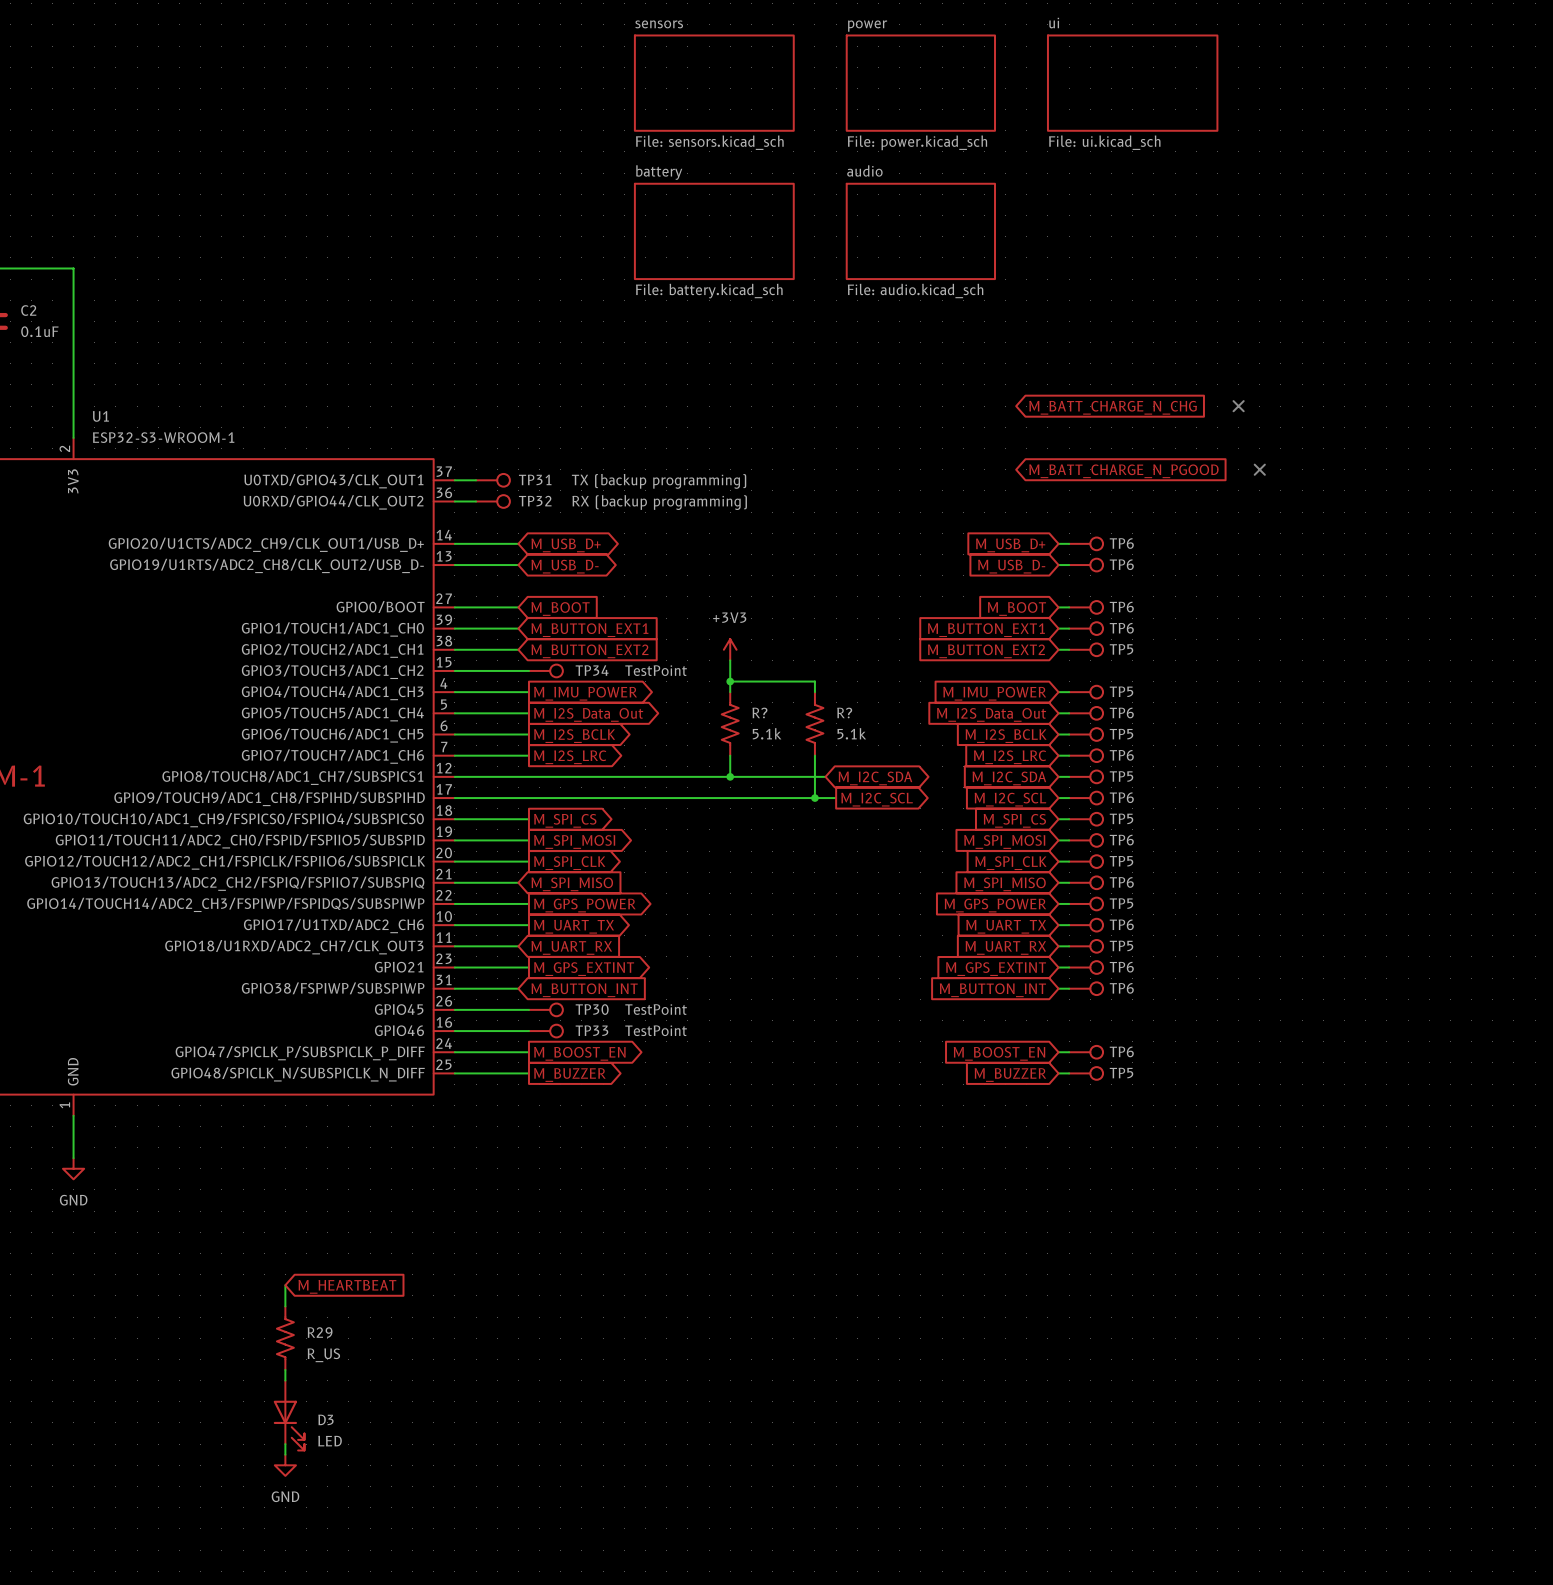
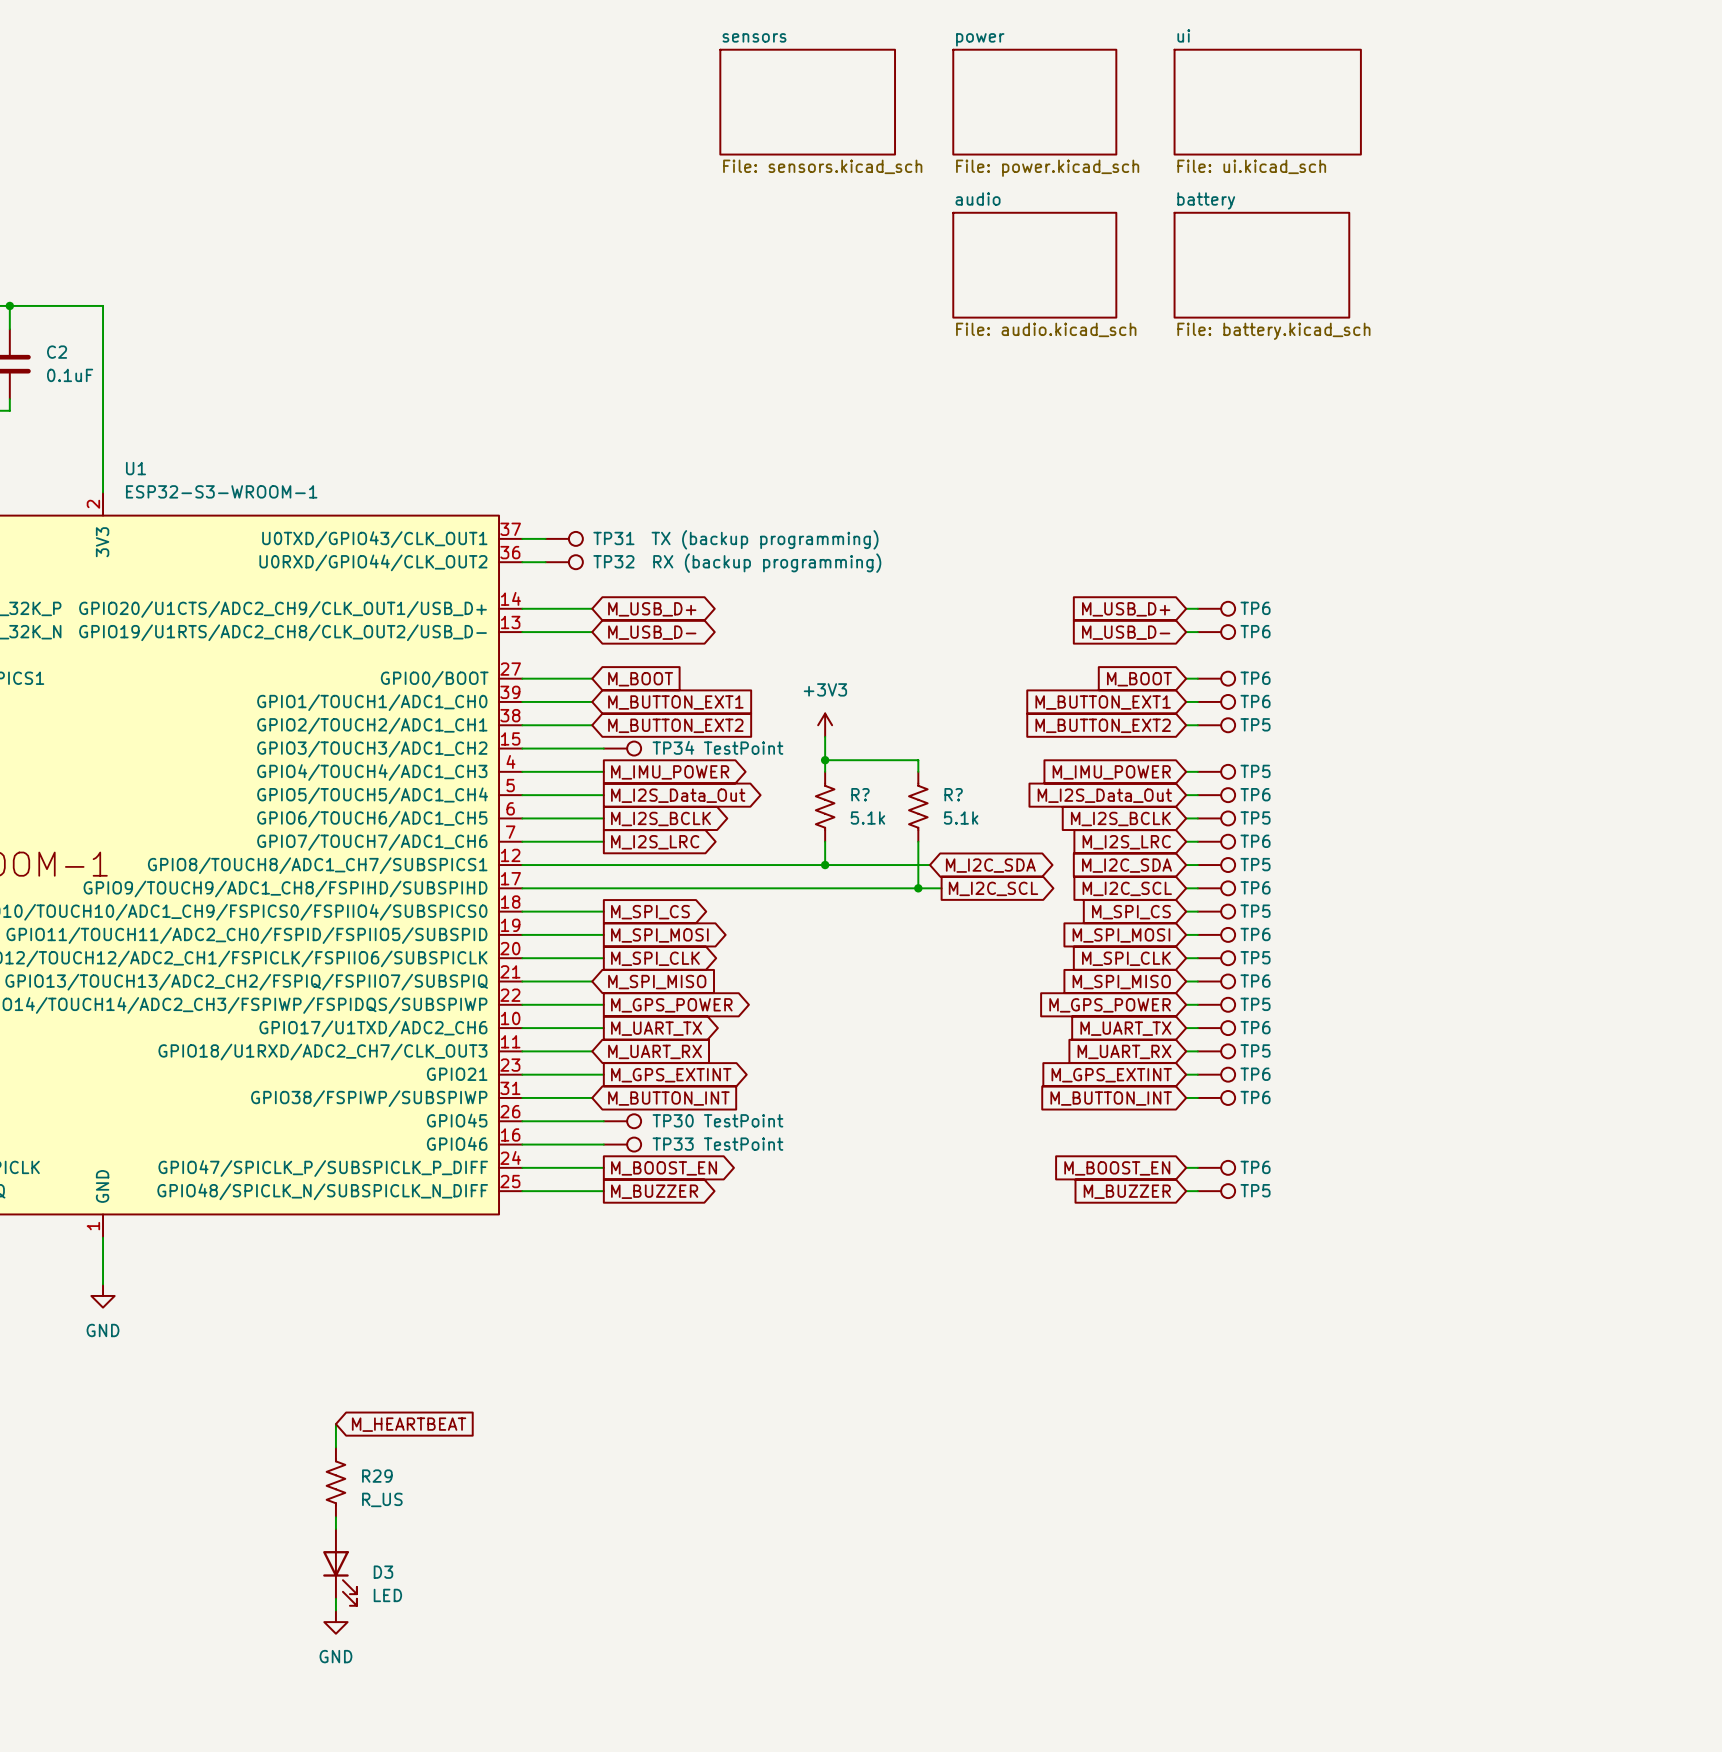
sheet battery: File: battery.kicad_sch (714, 231) -> none
sheet battery: none -> File: battery.kicad_sch (1261, 265)
no-connect mark: (1238, 406) -> none
global label: M_BATT_CHARGE_N_CHG (1113, 407) -> none
no-connect mark: (1259, 469) -> none
global label: M_BATT_CHARGE_N_PGOOD (1123, 471) -> none

